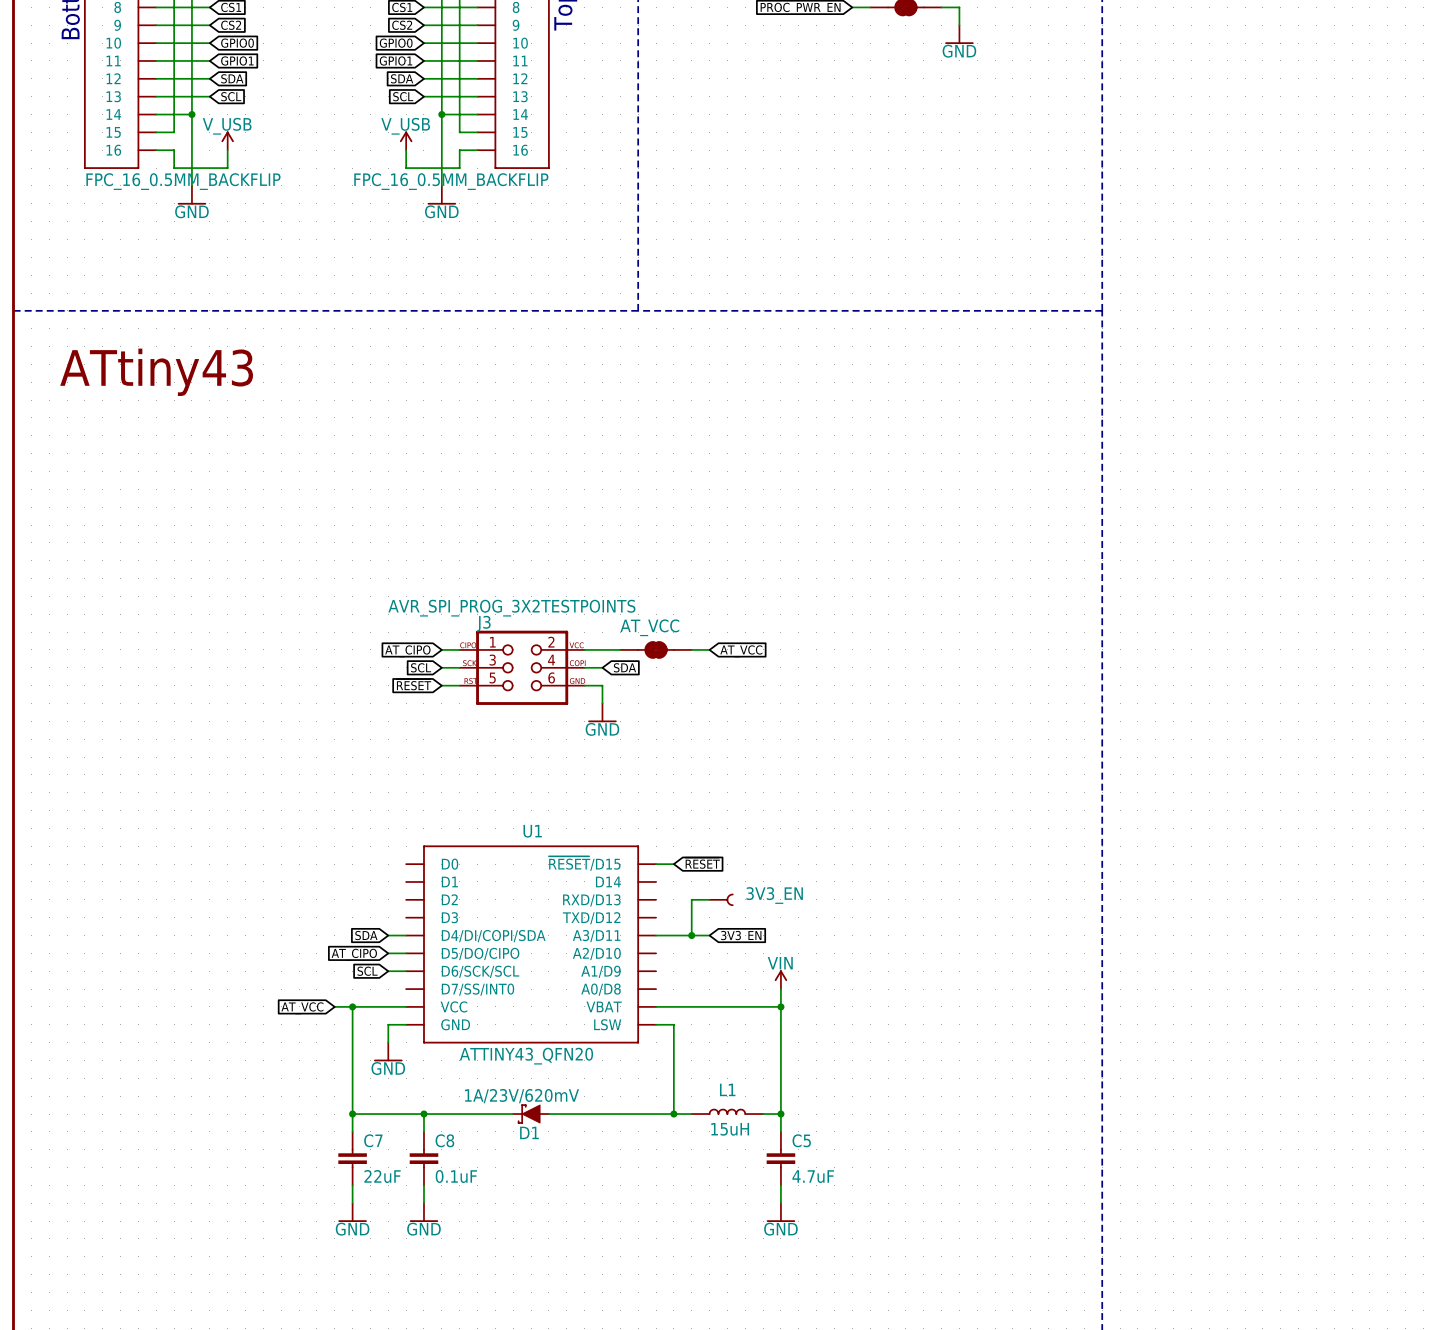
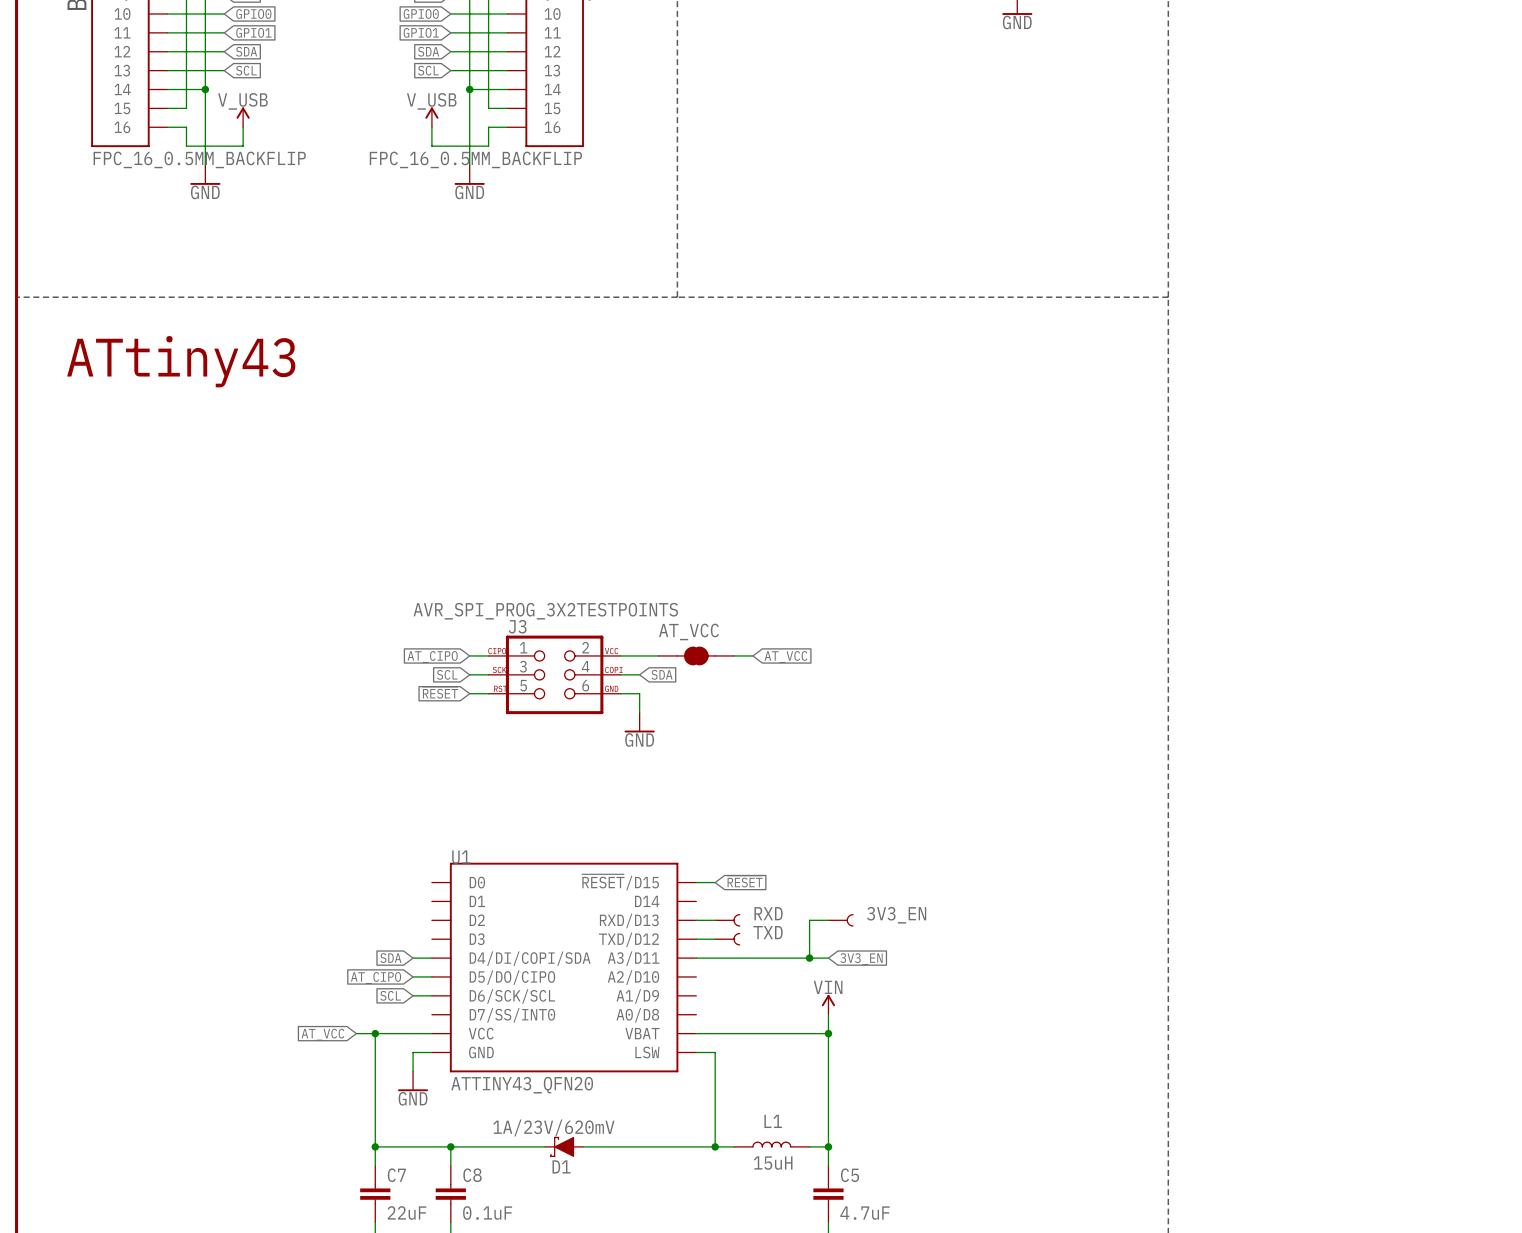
U1 name position: U1 (532, 831) -> U1 (461, 857)
wire: none -> (696, 920) (715, 920)
RXD: none -> (727, 920)
wire: (709, 899) (691, 899) (691, 935) -> (828, 920) (809, 920) (809, 958)
3V3_EN position: (721, 899) -> (840, 920)
wire: none -> (696, 939) (715, 939)
TXD: none -> (727, 939)
junction: (691, 935) -> none
wire: none -> (752, 958) (828, 958)
junction: none -> (809, 958)
global label position: 3V3_EN (741, 936) -> 3V3_EN (861, 959)
U1 value position: ATTINY43_QFN20 (526, 1056) -> ATTINY43_QFN20 (522, 1085)

